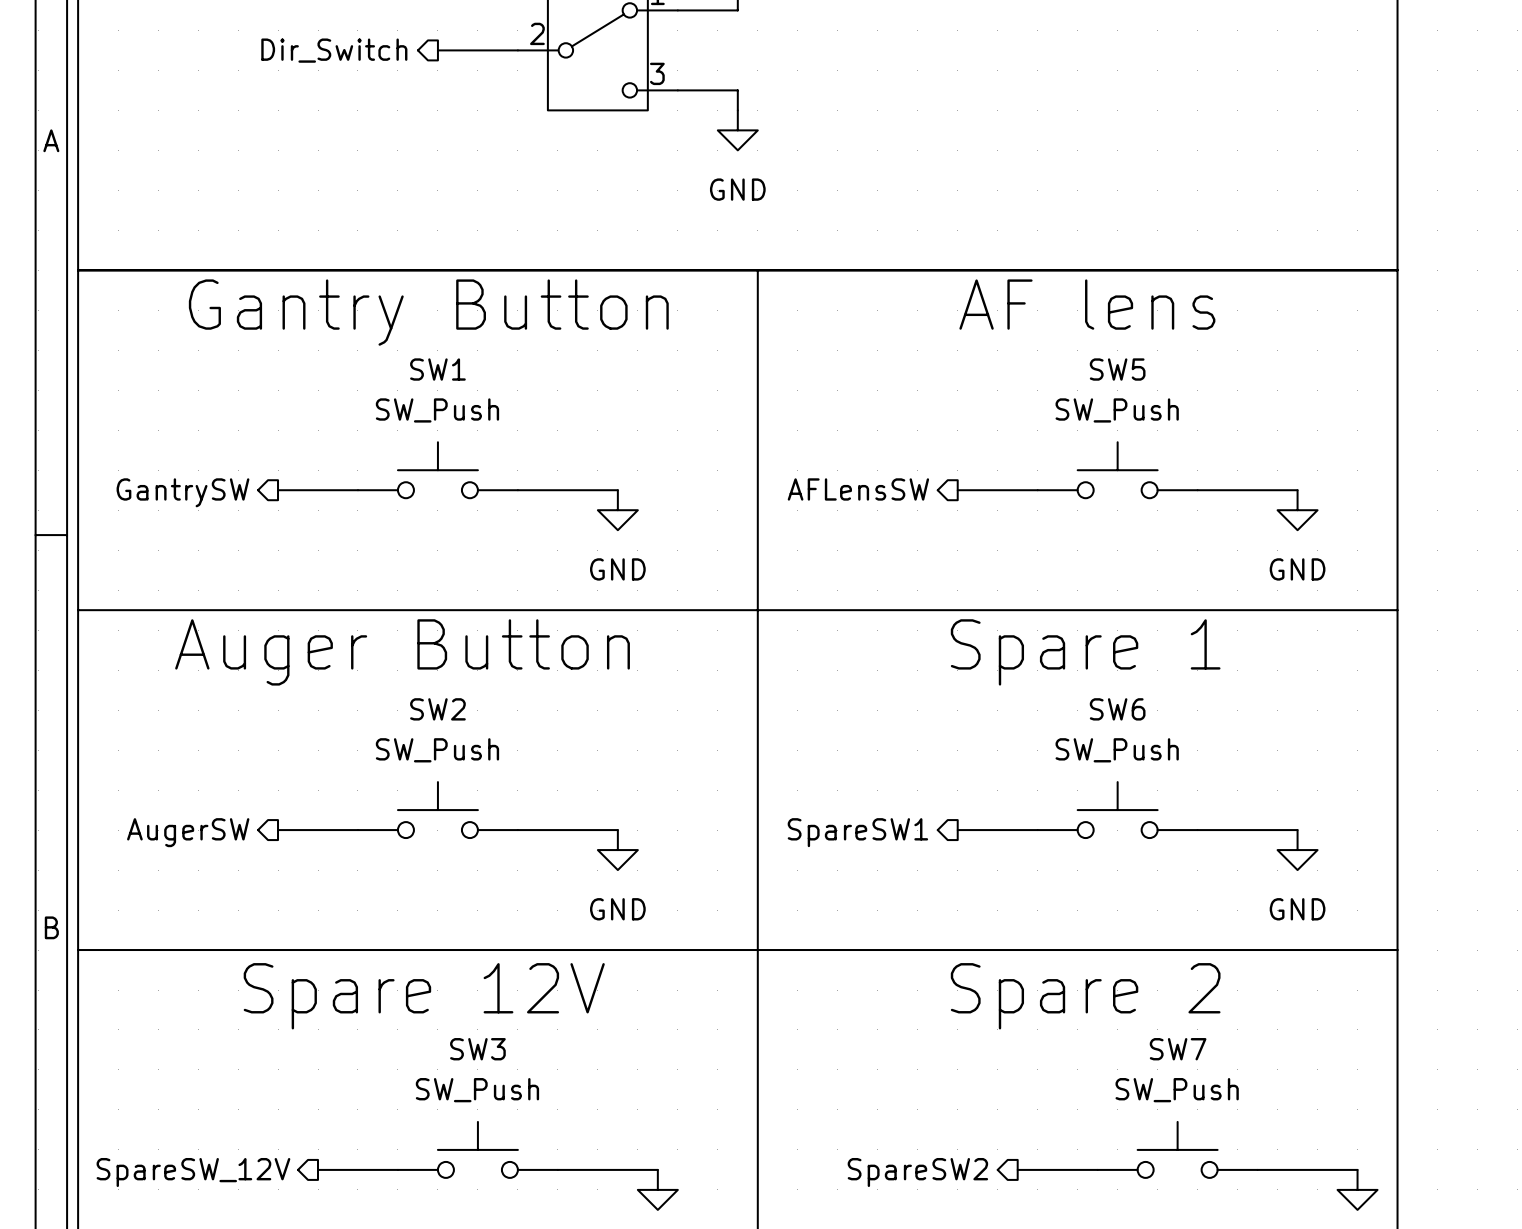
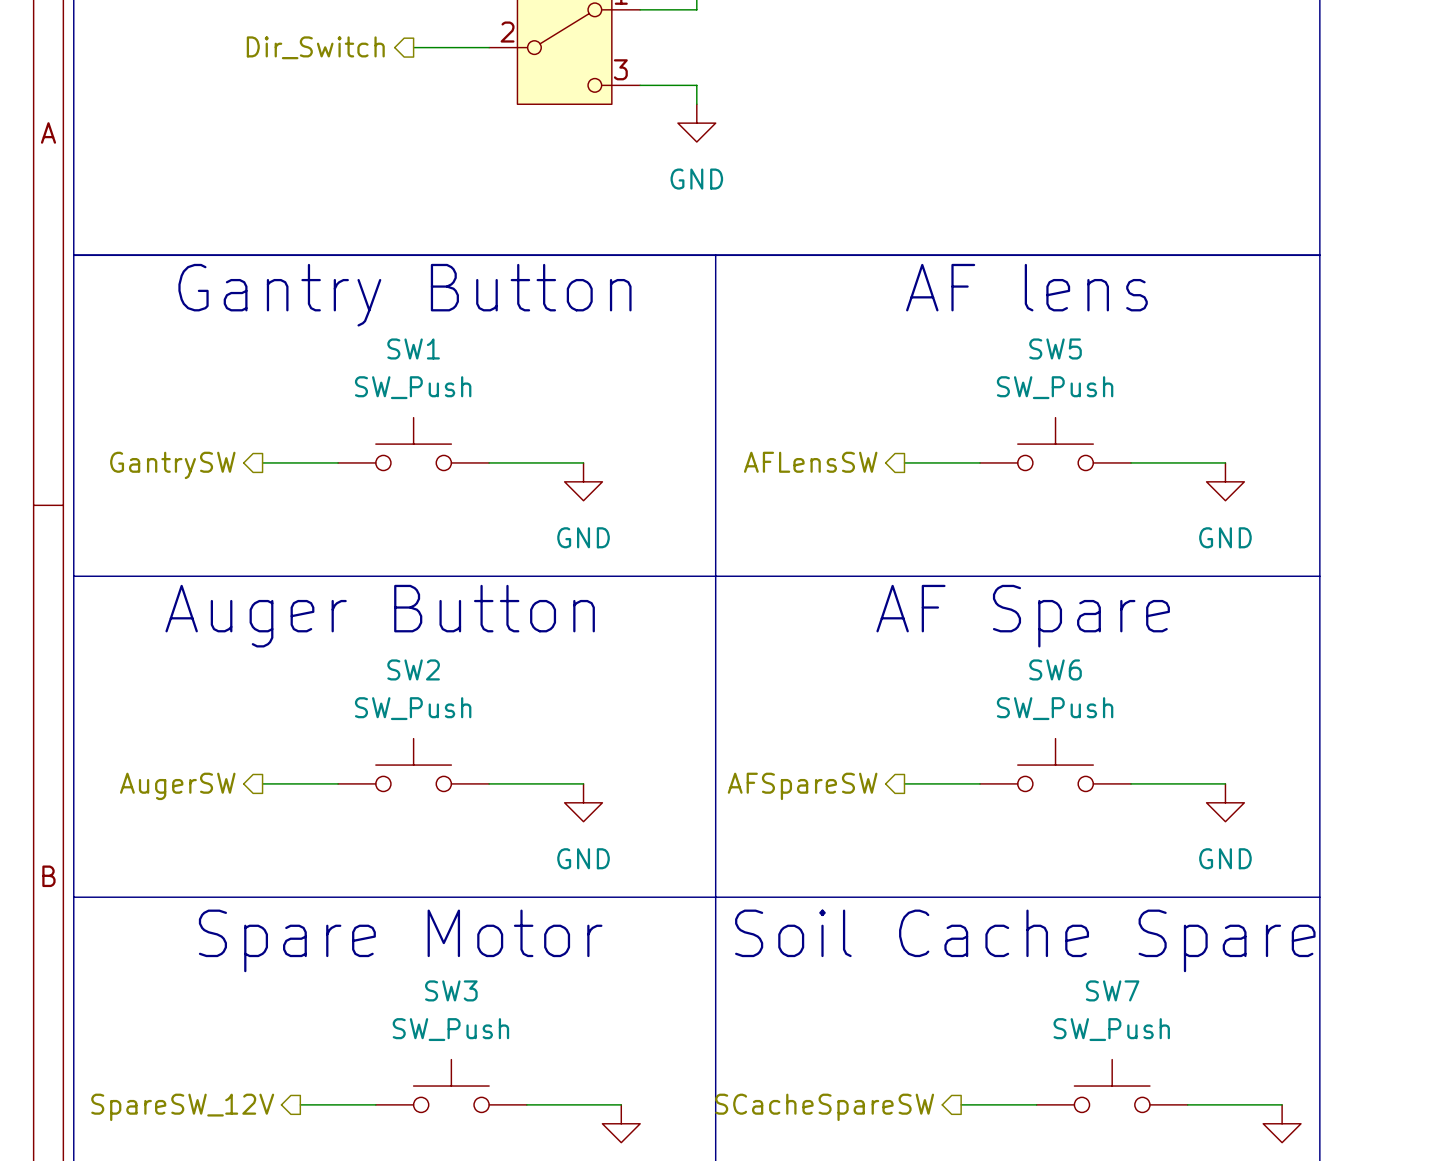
text: Spare 1 (1085, 652) -> AF Spare (1023, 616)
hierarchical label: SpareSW1 (857, 832) -> AFSpareSW (802, 786)
text: Spare 12V (424, 996) -> Spare Motor (400, 940)
text: Spare 2 (1085, 996) -> Soil Cache Spare (1025, 940)
hierarchical label: SpareSW2 (917, 1172) -> SCacheSpareSW (824, 1107)

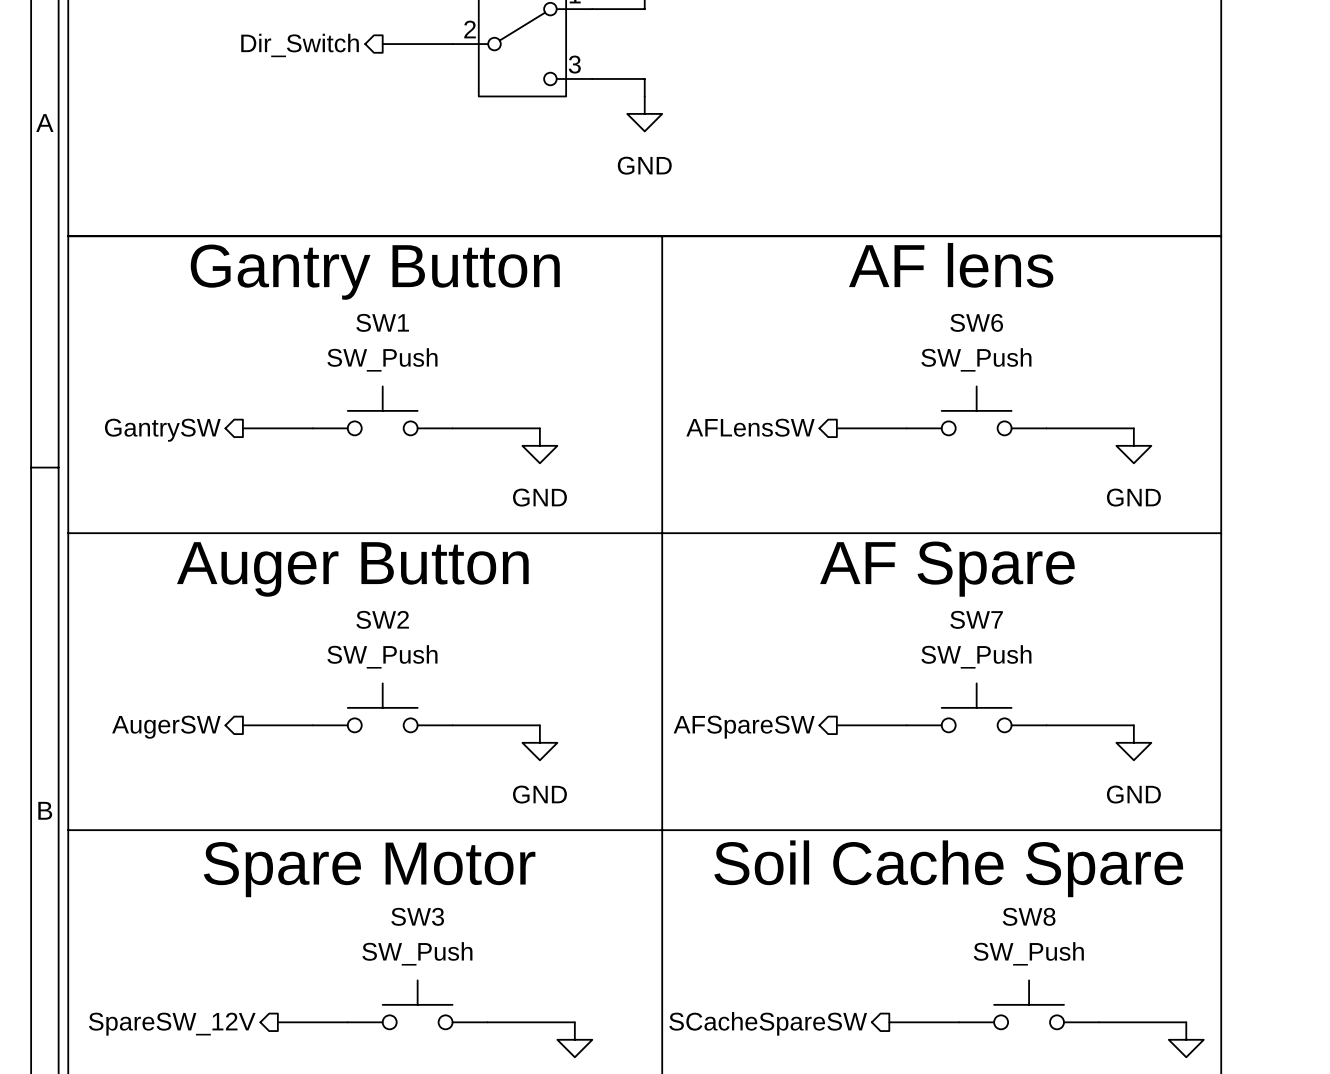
SW5 name: SW5 (1055, 348) -> SW6 (976, 322)
SW6 name: SW6 (1055, 669) -> SW7 (976, 619)
SW7 name: SW7 (1112, 990) -> SW8 (1029, 916)

